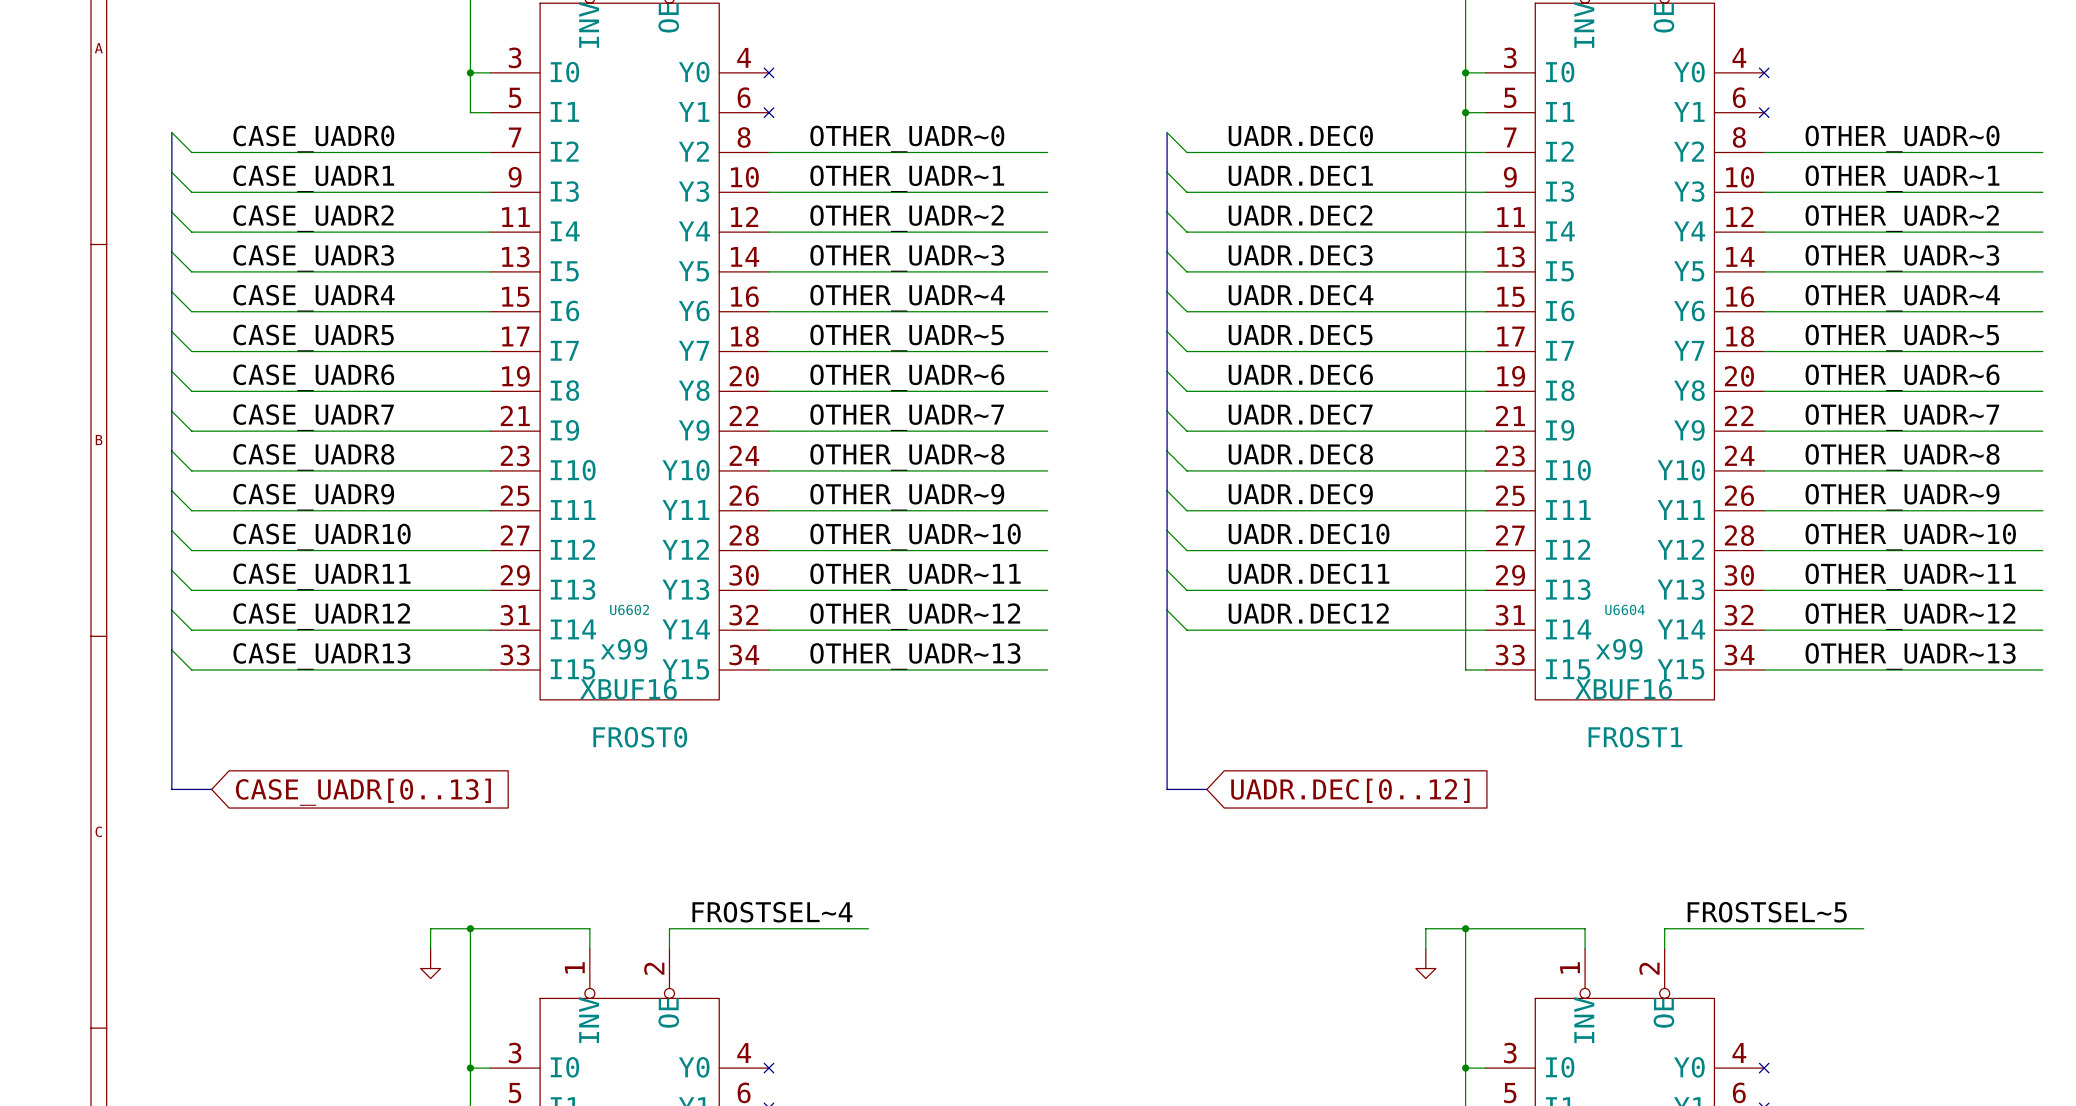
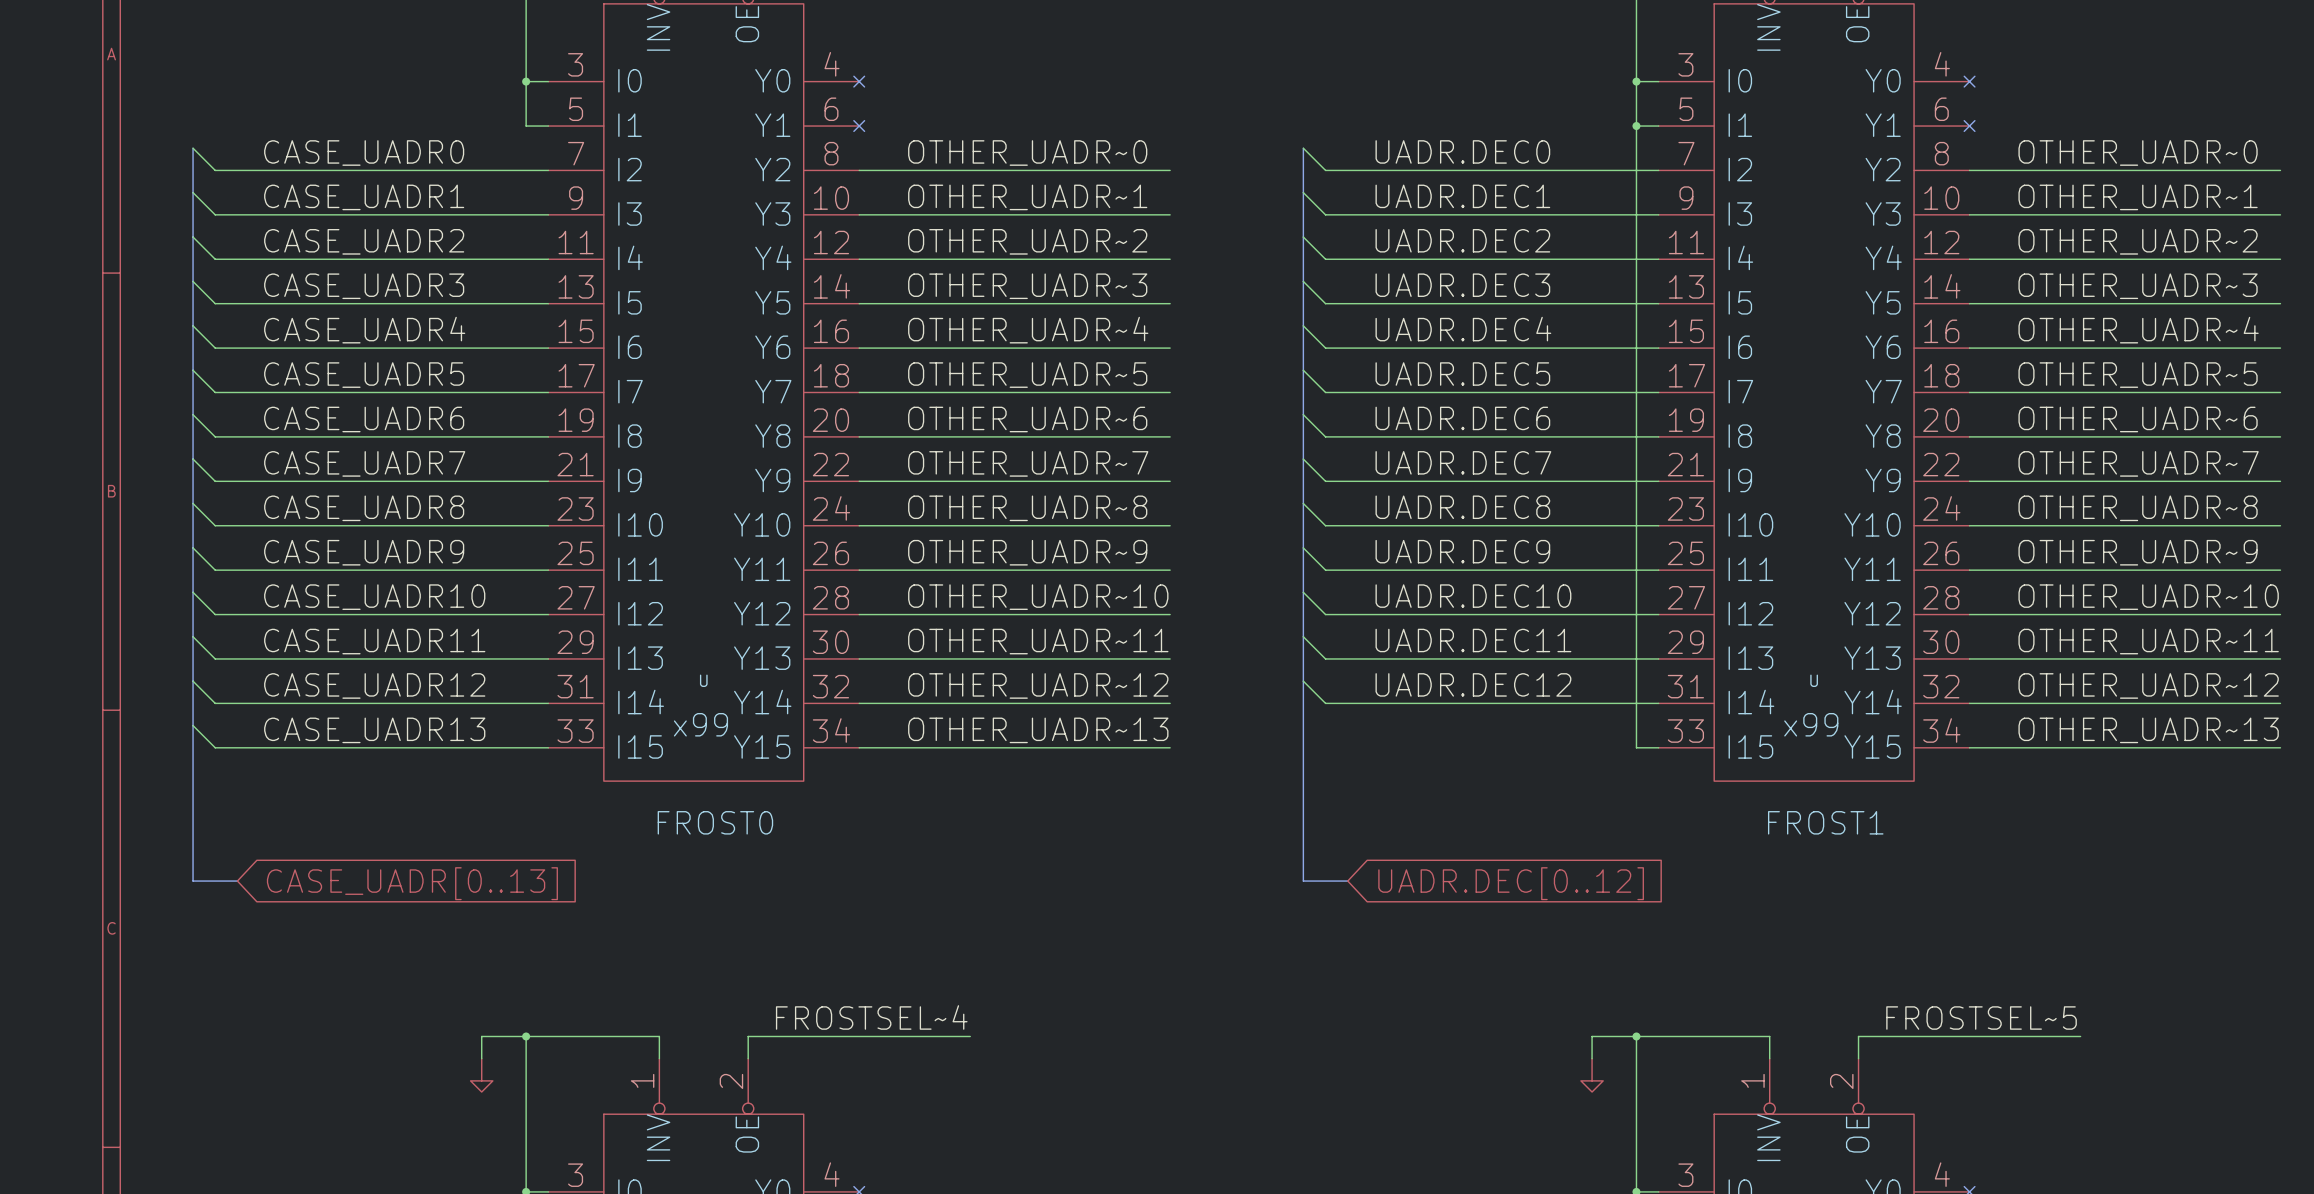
U6602 name: U6602 (629, 609) -> U (703, 680)
U6604 name: U6604 (1625, 609) -> U (1814, 680)
U6602 value: XBUF16 (628, 689) -> none
U6604 value: XBUF16 (1623, 689) -> none

